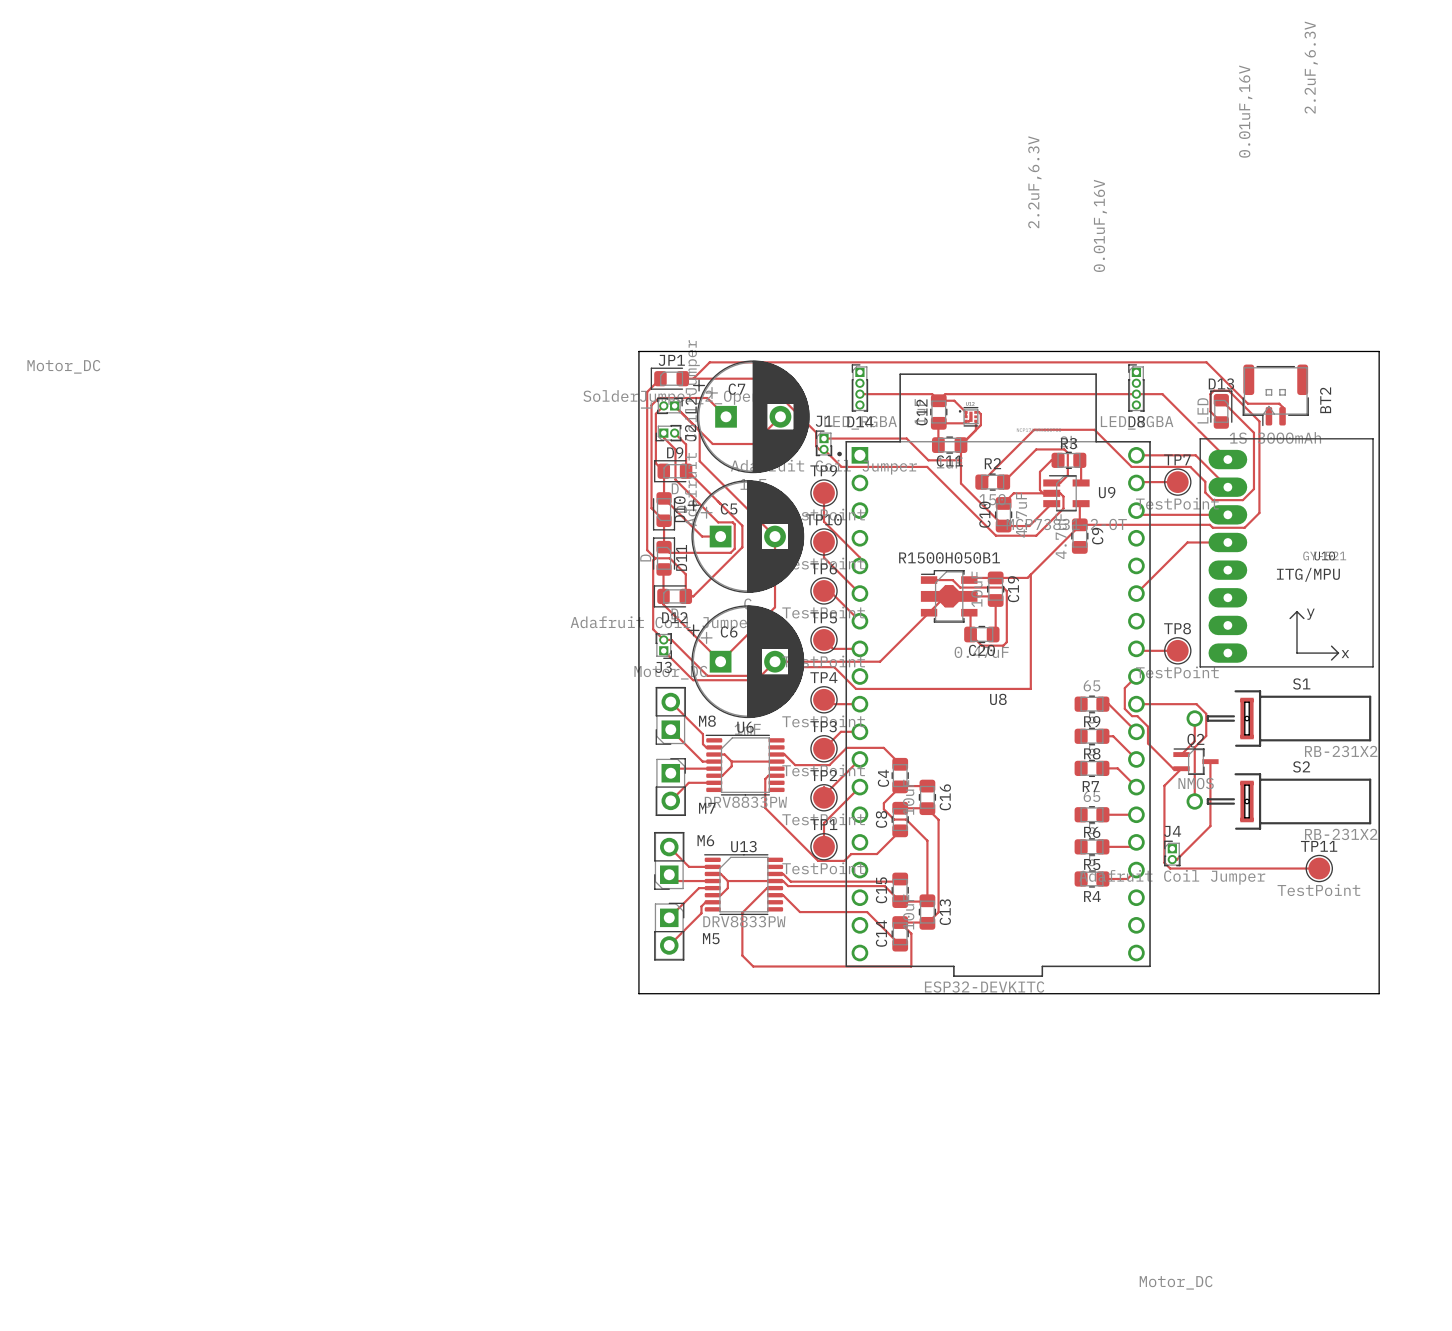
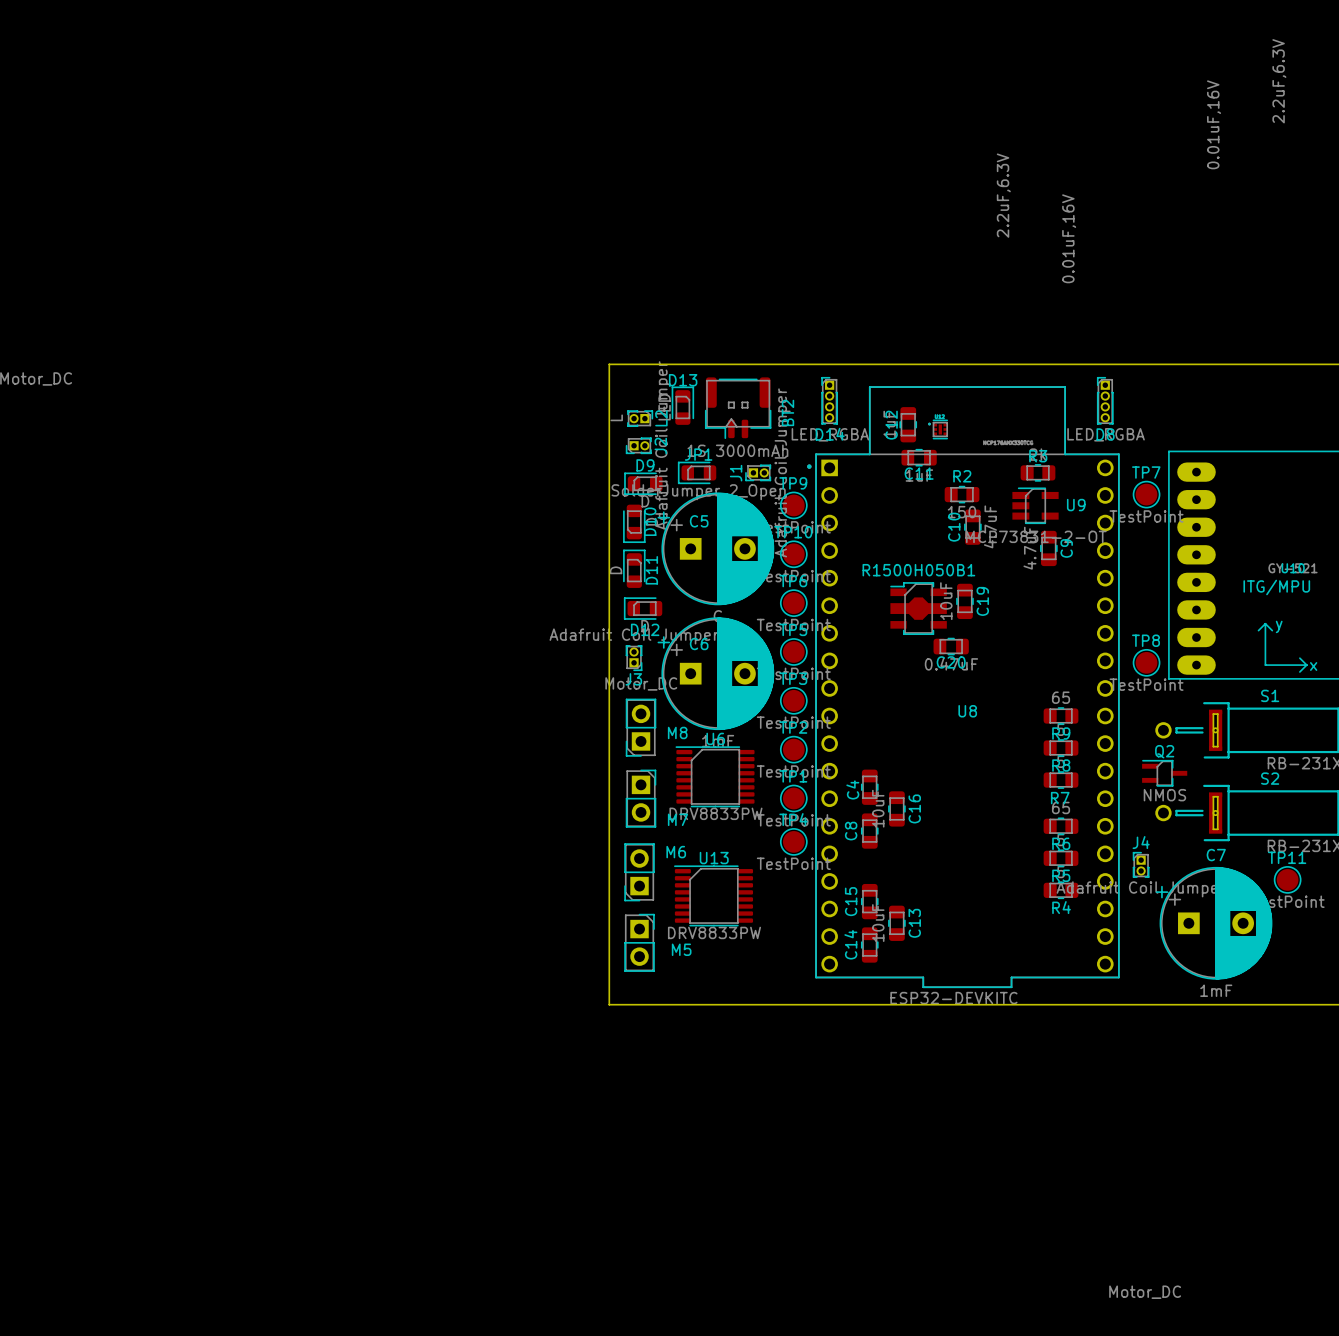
track: (660, 378) (647, 391) (647, 550) (655, 558) -> none
JP1 position: (669, 378) -> (697, 472)
track: (682, 378) (762, 378) (816, 432) (816, 446) (819, 449) (824, 449) (841, 466) (927, 466) (995, 535) (1036, 535) (1063, 508) (1063, 496) (1060, 493) (1013, 493) (1003, 503) -> none
track: (693, 378) (709, 362) (1206, 362) (1247, 403) (1279, 403) (1282, 406) (1282, 416) -> none
C7 name position: C7 (736, 389) -> C7 (1216, 855)
track: (859, 394) (932, 394) (938, 400) -> none
BT2 position: (1275, 395) -> (738, 408)
track: (938, 400) (945, 394) (1162, 394) (1227, 459) -> none
track: (938, 400) (954, 400) (966, 412) (966, 416) -> none
track: (1221, 400) (1253, 432) (1253, 489) (1242, 500) (1212, 500) (1205, 492) (1205, 481) (1190, 466) (1131, 466) (1094, 429) (1034, 429) (981, 482) -> none
track: (663, 405) (655, 413) (655, 463) (664, 471) (664, 498) (702, 536) (720, 536) -> none
track: (674, 405) (712, 444) (753, 444) (780, 416) -> none
D13 position: (1221, 409) -> (682, 405)
track: (975, 412) (980, 414) (980, 425) (960, 445) (960, 483) (1003, 526) (1029, 526) (1051, 503) -> none
track: (726, 416) (707, 398) (658, 398) (651, 405) (651, 508) (664, 520) (664, 547) (669, 552) (730, 552) (734, 548) (734, 524) (732, 522) (718, 522) (675, 479) (675, 449) (663, 437) (663, 433) -> none
C7 position: (751, 416) -> (1214, 923)
track: (970, 416) (968, 421) (964, 423) (938, 423) (938, 445) -> none
track: (975, 421) (975, 430) -> none
track: (1221, 422) (1210, 411) (1210, 394) (1213, 390) (1228, 390) (1259, 421) (1259, 513) (1244, 527) (1212, 527) (1209, 524) (1079, 524) -> none
track: (699, 430) (699, 461) (775, 536) (775, 607) (720, 661) (663, 604) (664, 569) -> none
track: (674, 433) (686, 444) (686, 471) (742, 525) (742, 547) (693, 596) (685, 596) (685, 574) (669, 558) (655, 558) -> none
track: (824, 438) (906, 438) (928, 460) (960, 460) -> none
J1 rotation: 0° (824, 443) -> 90° counterclockwise (758, 472)
J1 position: (824, 443) -> (758, 472)
track: (1136, 455) (1195, 455) (1227, 487) -> none
track: (1058, 460) (1051, 460) (1039, 471) (1039, 490) (1043, 493) -> none
track: (1079, 460) (1081, 482) -> none
track: (1003, 482) (1036, 449) (1064, 449) (1067, 452) (1067, 475) (1060, 482) (1051, 482) -> none
track: (1177, 482) (1136, 482) -> none
track: (824, 492) (824, 521) (859, 557) (859, 565) -> none
track: (1081, 503) (1079, 525) (1027, 577) (971, 577) (969, 580) -> none
track: (1136, 510) (1140, 514) (1227, 514) -> none
track: (824, 541) (824, 557) (859, 593) -> none
track: (1227, 542) (1187, 542) (1136, 593) -> none
track: (655, 558) (653, 560) (653, 629) (663, 639) (671, 639) (707, 675) (760, 675) (775, 661) (880, 661) (945, 596) (991, 596) (995, 600) (995, 631) (993, 634) -> none
track: (1030, 574) (1030, 688) (856, 688) (834, 667) (796, 667) (783, 680) (693, 680) (663, 650) -> none
track: (929, 580) (952, 580) (960, 587) (1003, 587) (1006, 591) (1006, 642) (1003, 645) (981, 645) (970, 634) (969, 612) -> none
track: (824, 590) (829, 590) (859, 621) -> none
track: (824, 639) (832, 648) (859, 648) -> none
track: (1136, 648) (1138, 650) (1177, 650) -> none
track: (1136, 676) (1124, 688) (1124, 708) (1132, 716) (1137, 716) (1148, 726) (1148, 743) (1173, 768) (1181, 768) (1164, 785) (1164, 862) (1170, 868) (1319, 868) -> none
track: (824, 699) (828, 704) (859, 704) -> none
TP4 position: (824, 699) -> (793, 841)
track: (670, 702) (702, 734) (702, 744) (706, 747) (714, 747) -> none
track: (1102, 704) (1108, 704) (1136, 731) -> none
track: (1136, 704) (1196, 704) (1206, 713) (1206, 735) (1194, 747) (1194, 801) -> none
track: (1194, 718) (1194, 741) (1181, 754) -> none
track: (670, 729) (702, 761) (714, 761) -> none
track: (859, 731) (840, 731) (824, 748) -> none
track: (1102, 736) (1113, 736) (1136, 759) -> none
TP3 position: (824, 748) -> (793, 700)
track: (714, 754) (724, 754) (731, 761) -> none
track: (776, 754) (784, 754) (795, 765) (829, 765) (846, 747) (883, 747) (900, 764) -> none
track: (859, 759) (824, 795) (824, 797) -> none
track: (731, 761) (776, 761) -> none
track: (731, 761) (731, 766) (722, 775) (714, 775) -> none
track: (1210, 761) (1210, 826) (1176, 859) (1172, 859) -> none
track: (714, 768) (675, 768) (670, 773) -> none
track: (1102, 768) (1117, 768) (1136, 787) -> none
track: (776, 775) (768, 775) (765, 778) (765, 808) (818, 860) (844, 860) (851, 854) (876, 854) (900, 830) -> none
track: (714, 782) (688, 782) (670, 800) -> none
track: (824, 786) (824, 787) -> none
track: (927, 786) (901, 786) (883, 803) (883, 809) (894, 819) (906, 819) (927, 840) (926, 901) (900, 901) (884, 886) (788, 886) (783, 881) (727, 881) -> none
track: (859, 787) (824, 823) (824, 846) -> none
TP2 position: (824, 797) -> (793, 749)
track: (900, 808) (927, 808) (938, 819) (938, 912) (927, 923) (900, 922) (911, 933) (911, 966) (753, 966) (742, 955) (742, 912) (767, 888) (775, 888) -> none
track: (1102, 814) (1136, 814) -> none
track: (1136, 842) (1131, 846) (1102, 846) -> none
TP1 position: (824, 846) -> (793, 798)
track: (669, 847) (689, 866) (712, 866) -> none
track: (1136, 870) (1127, 878) (1102, 878) -> none
track: (712, 873) (720, 873) (727, 881) -> none
track: (775, 873) (783, 873) (790, 881) (897, 881) (900, 879) -> none
track: (669, 874) (675, 881) (712, 881) -> none
track: (727, 881) (727, 888) (720, 895) (712, 895) -> none
track: (712, 888) (698, 888) (669, 917) -> none
track: (775, 895) (783, 895) (799, 912) (867, 912) (900, 945) -> none
track: (712, 902) (705, 902) (701, 906) (701, 913) (669, 945) -> none

